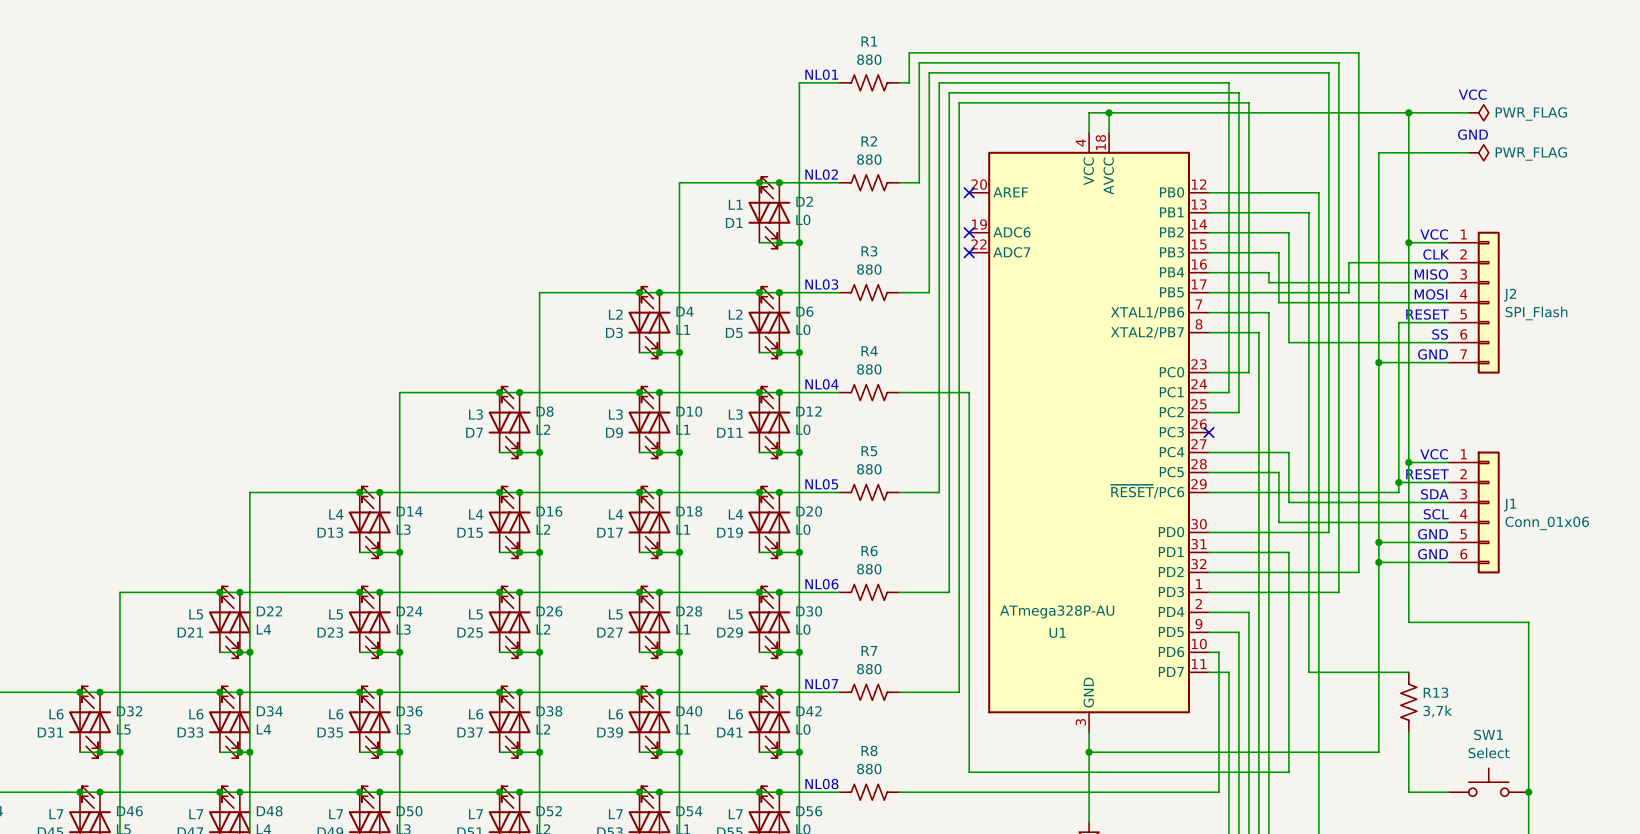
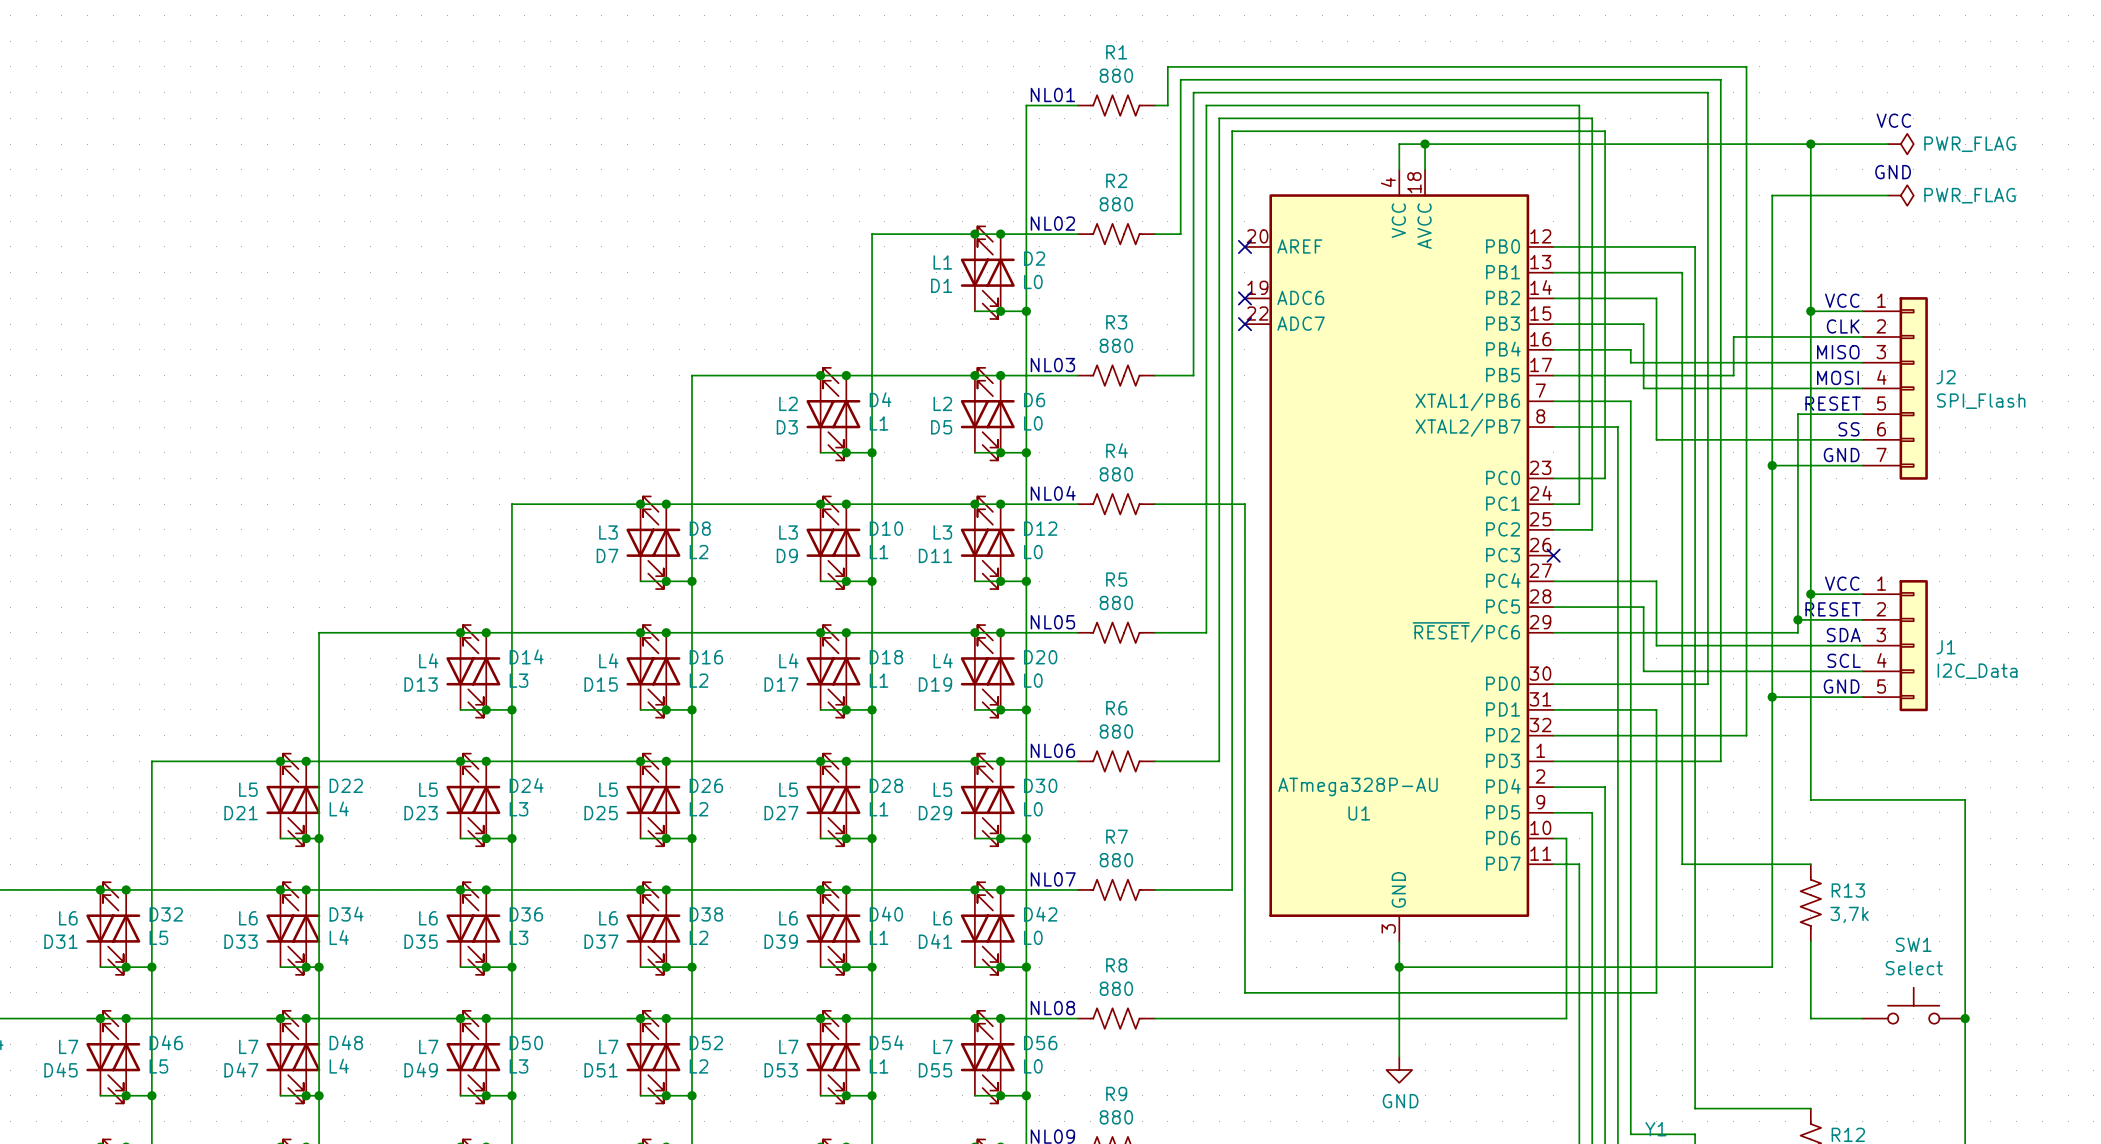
J1 symbol: [1448, 451, 1500, 574] -> [1862, 580, 1928, 712]
J1 value: Conn_01x06 (1547, 523) -> I2C_Data (1977, 671)
text: GND (1433, 554) -> none
wire: (1378, 562) (1448, 562) -> none
junction: (1378, 562) -> none

